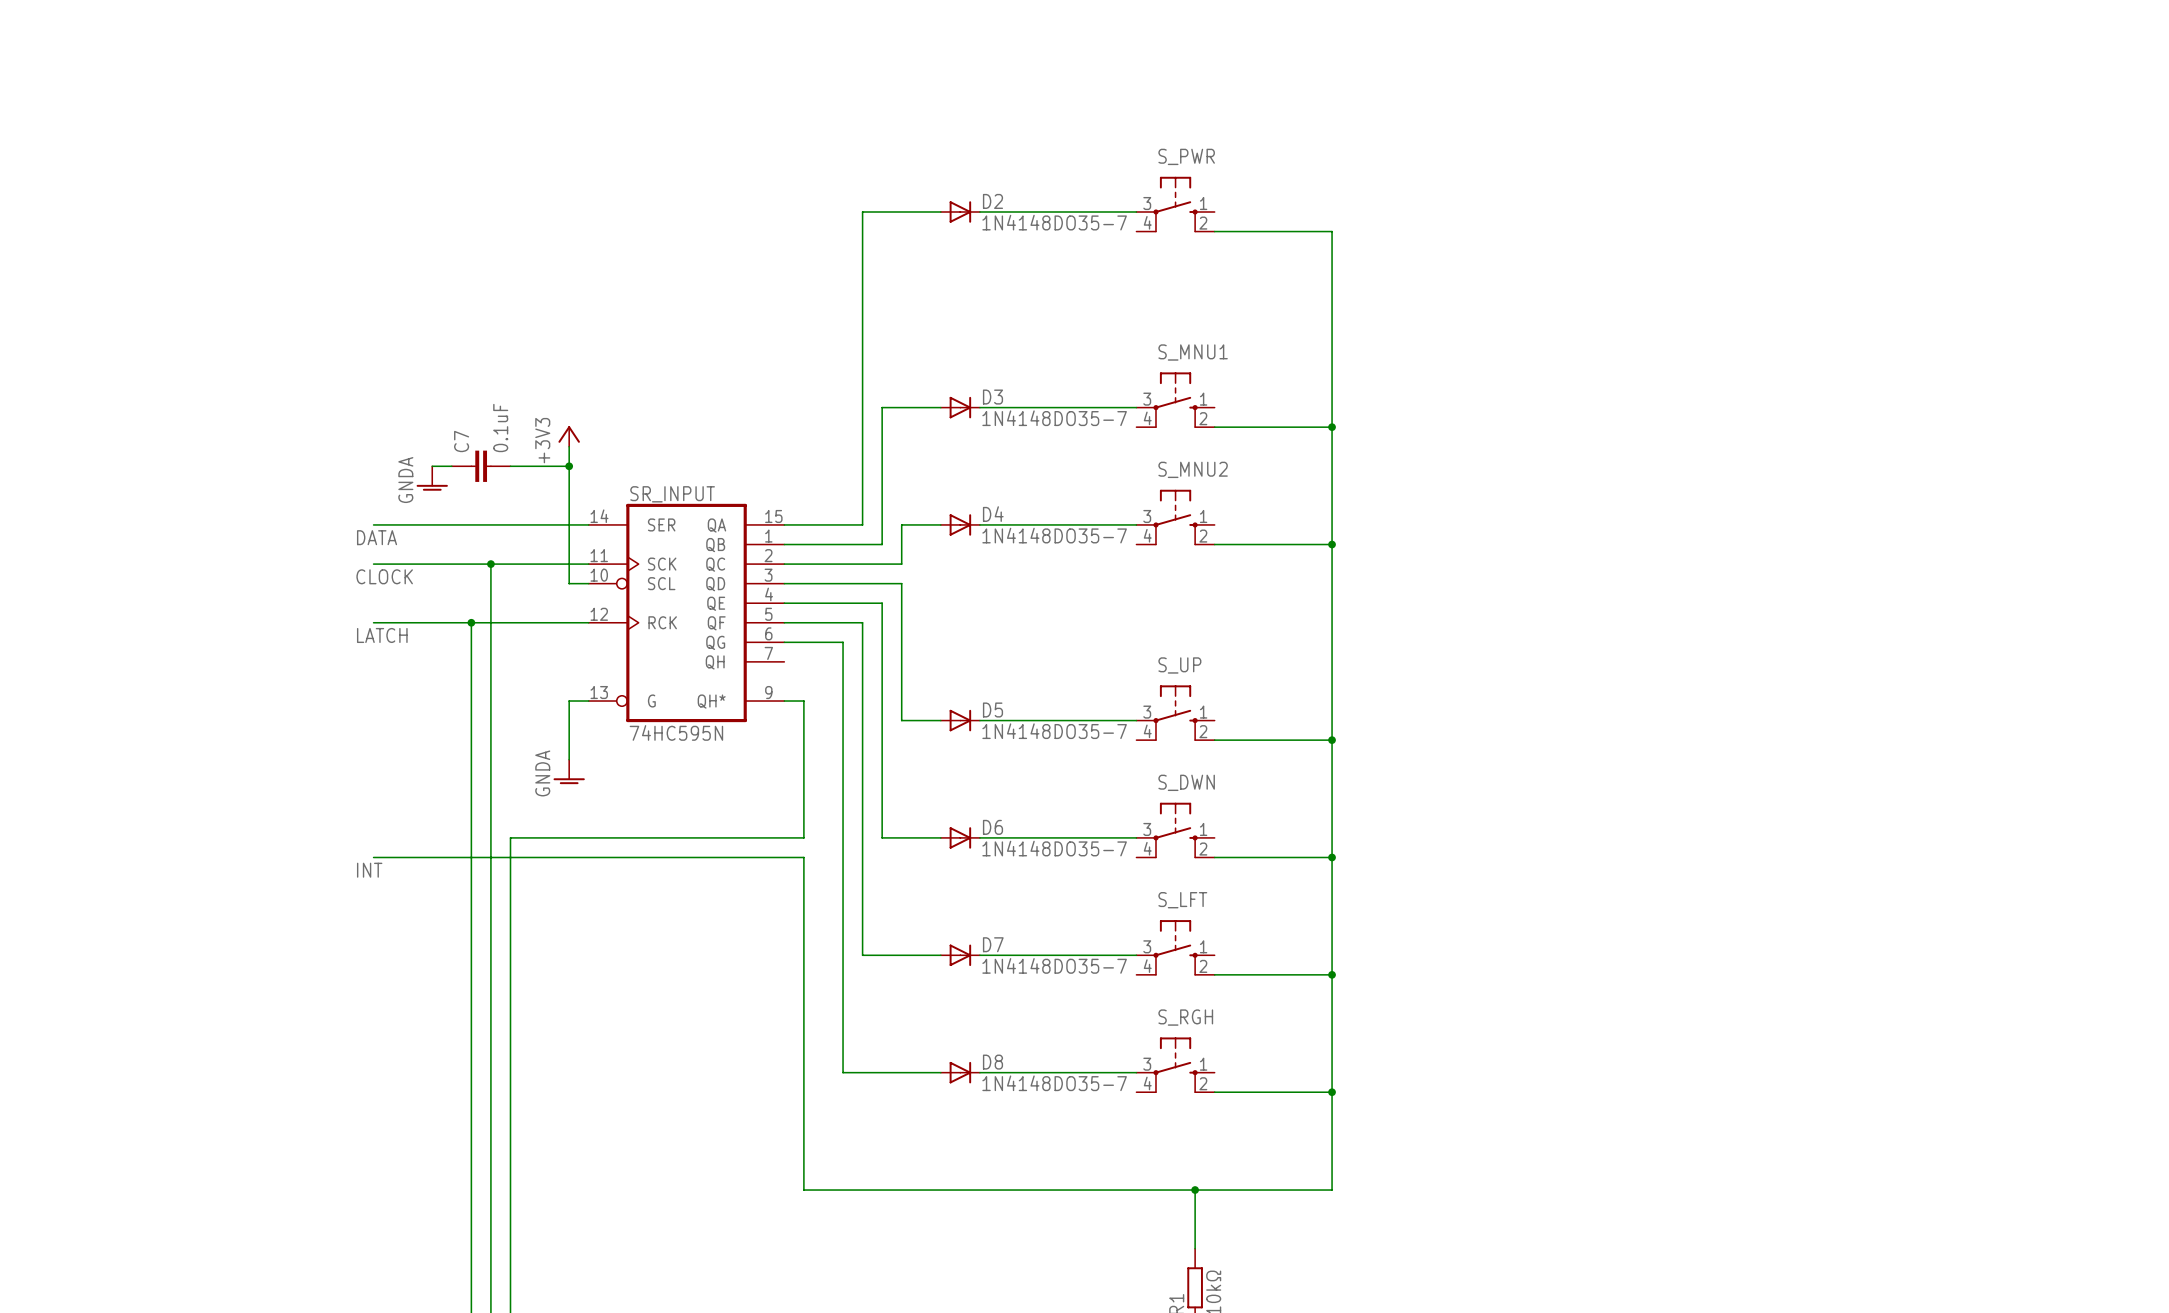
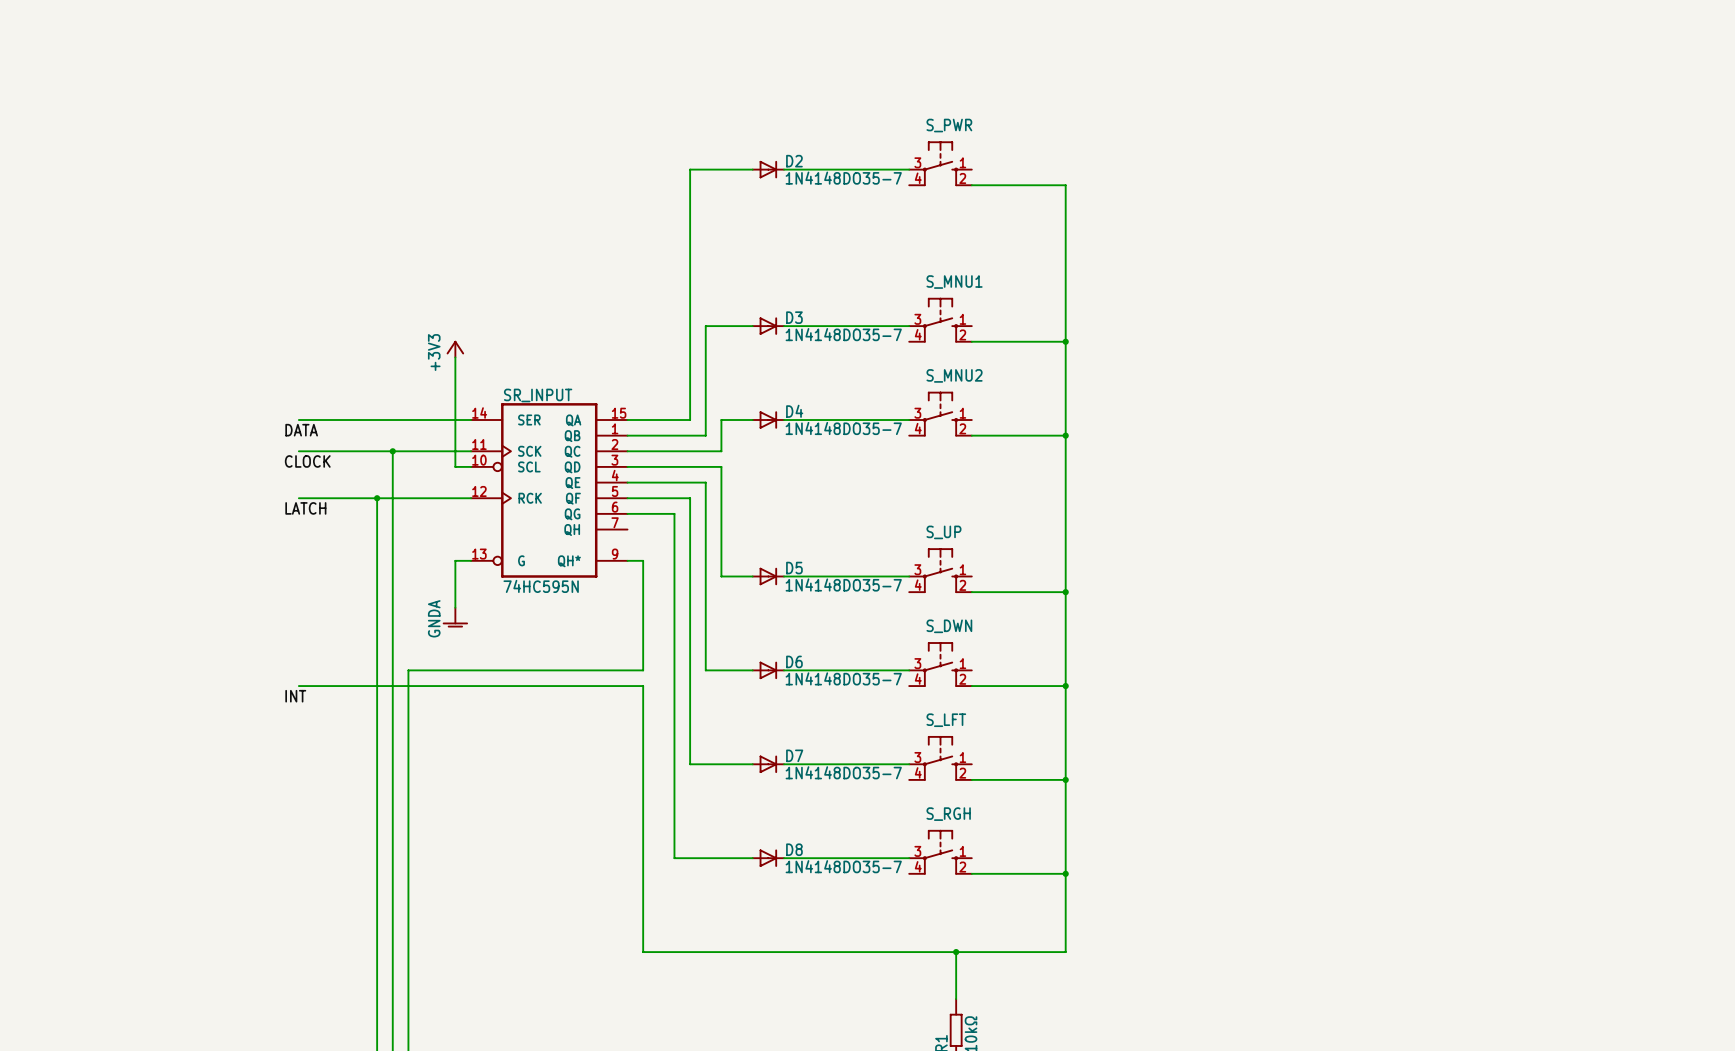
wire: (432, 466) (451, 466) -> none
C7: 0.1uF (481, 466) -> none
wire: (510, 466) (569, 466) -> none
junction: (569, 466) -> none
power symbol: GNDA (432, 478) -> none

